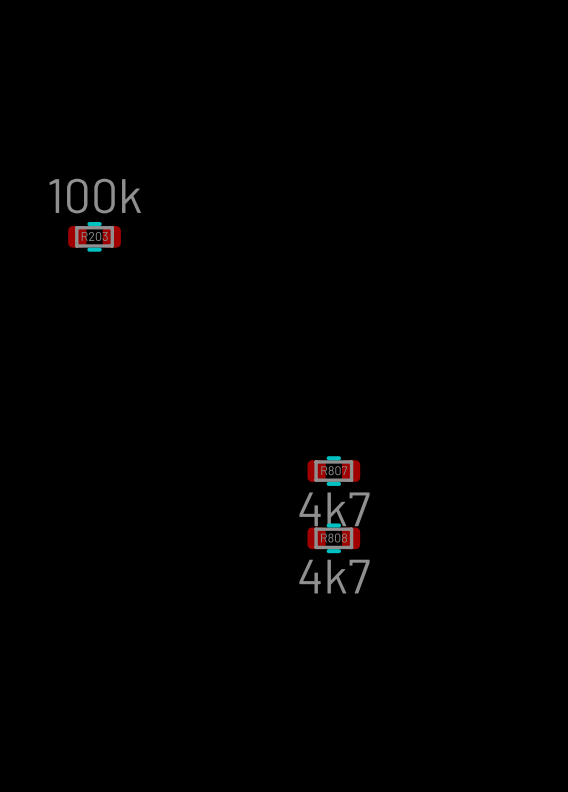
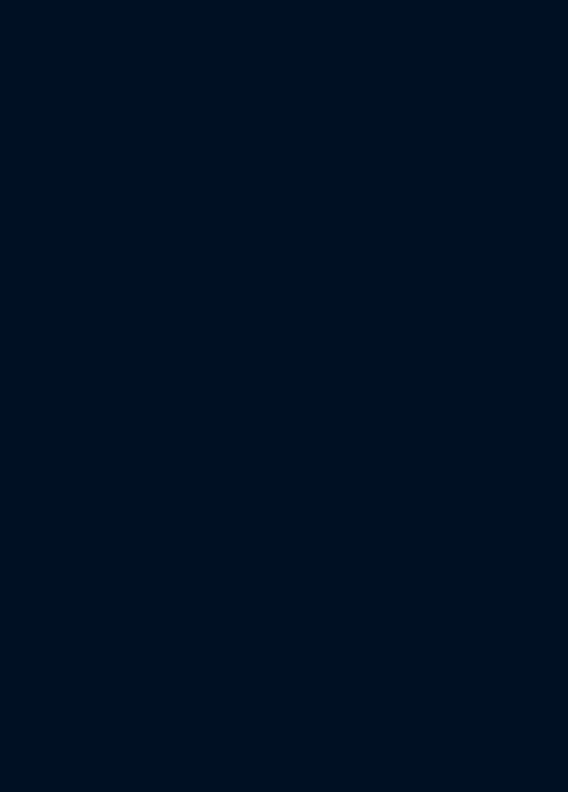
R203: 100k (94, 236) -> none
R807: 4k7 (333, 471) -> none
R808: 4k7 (333, 538) -> none

